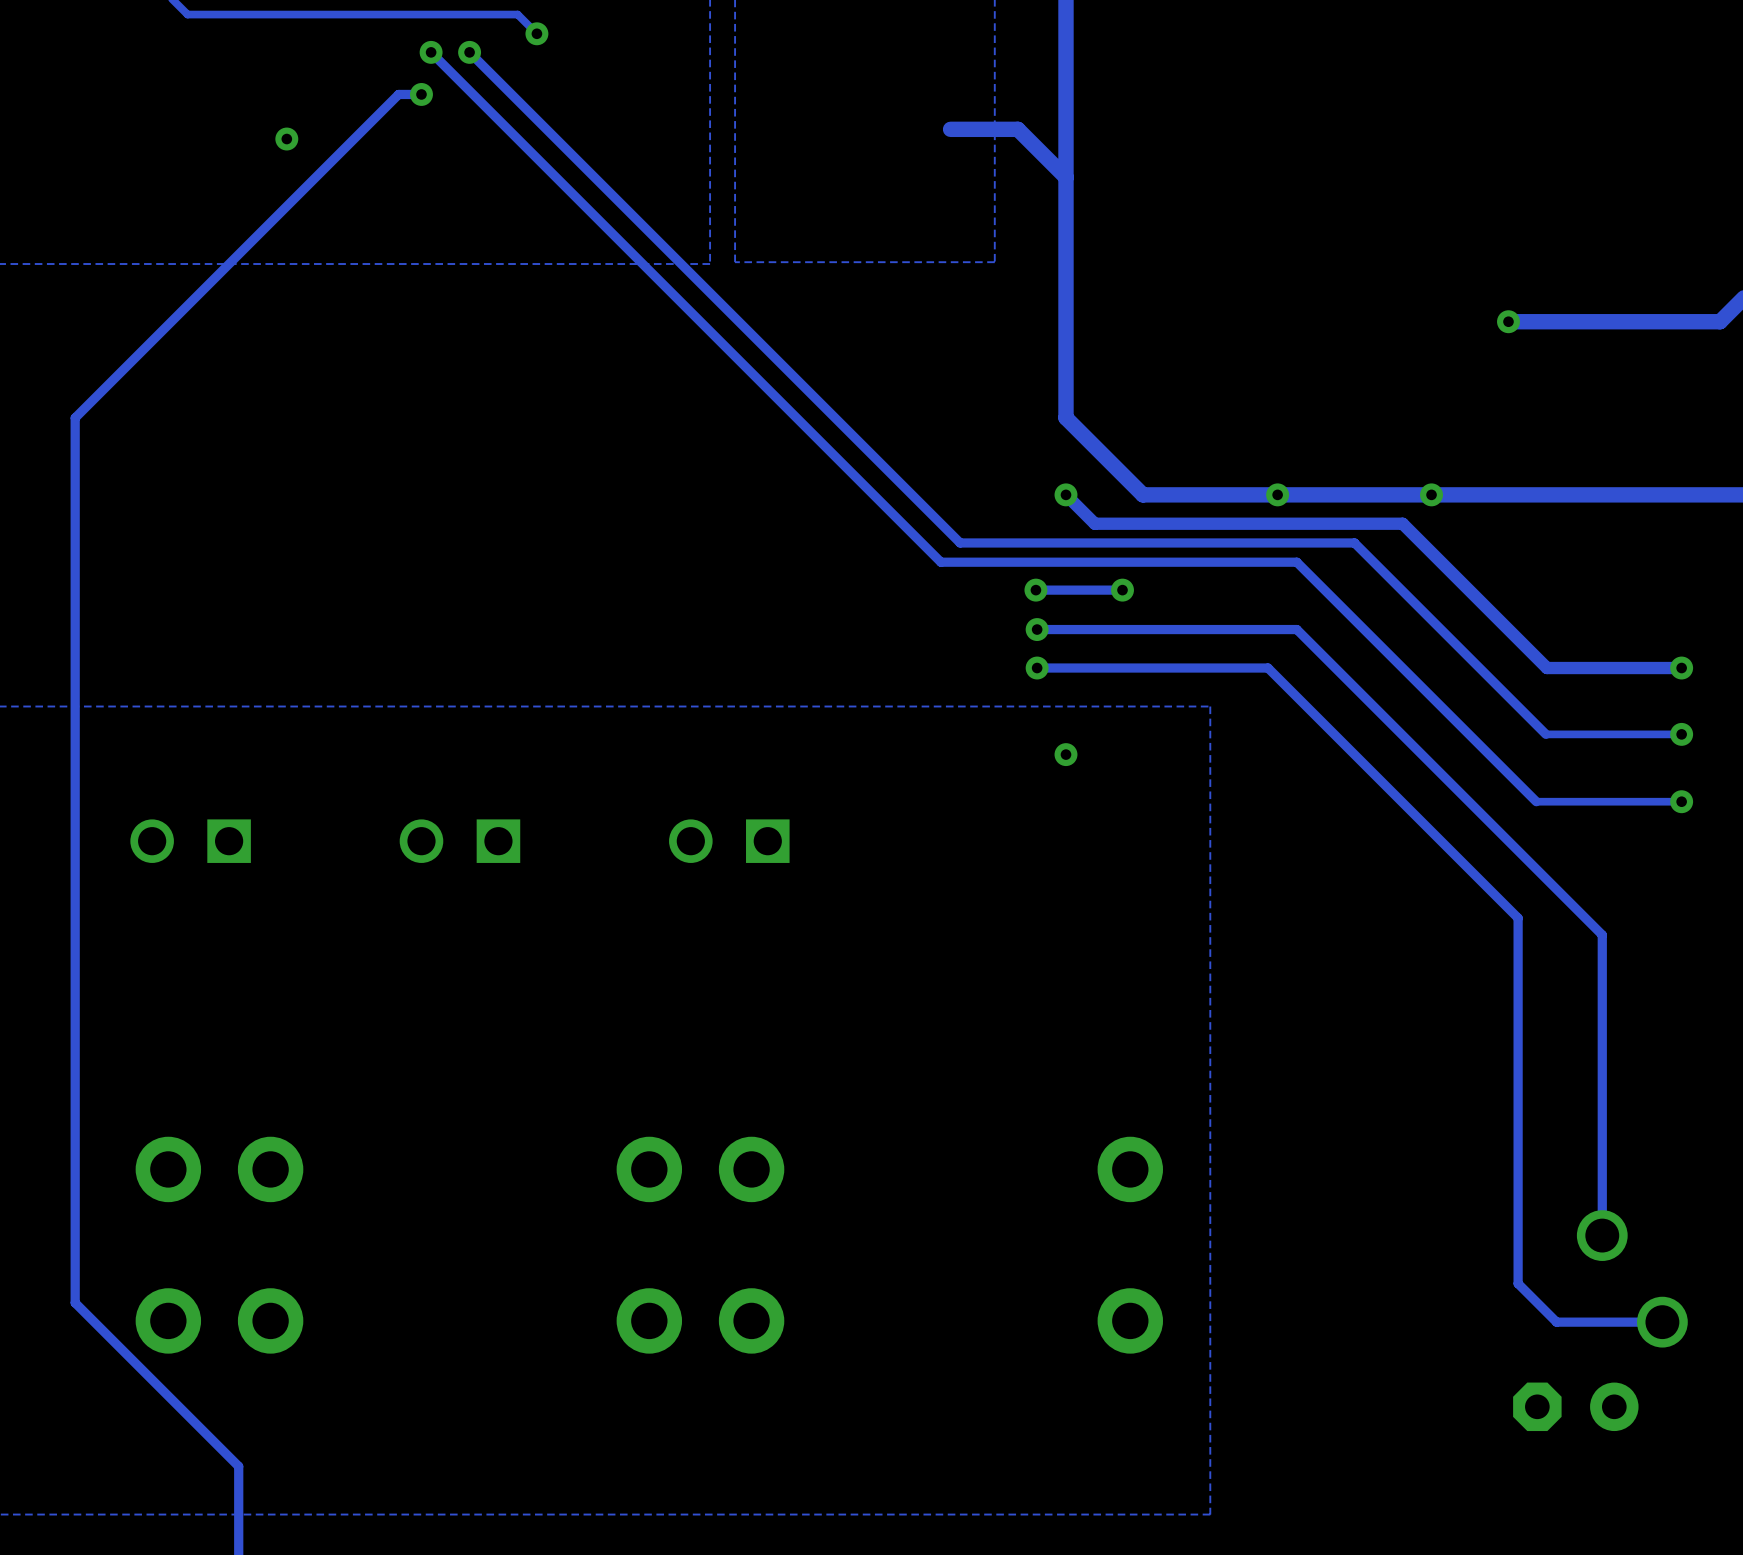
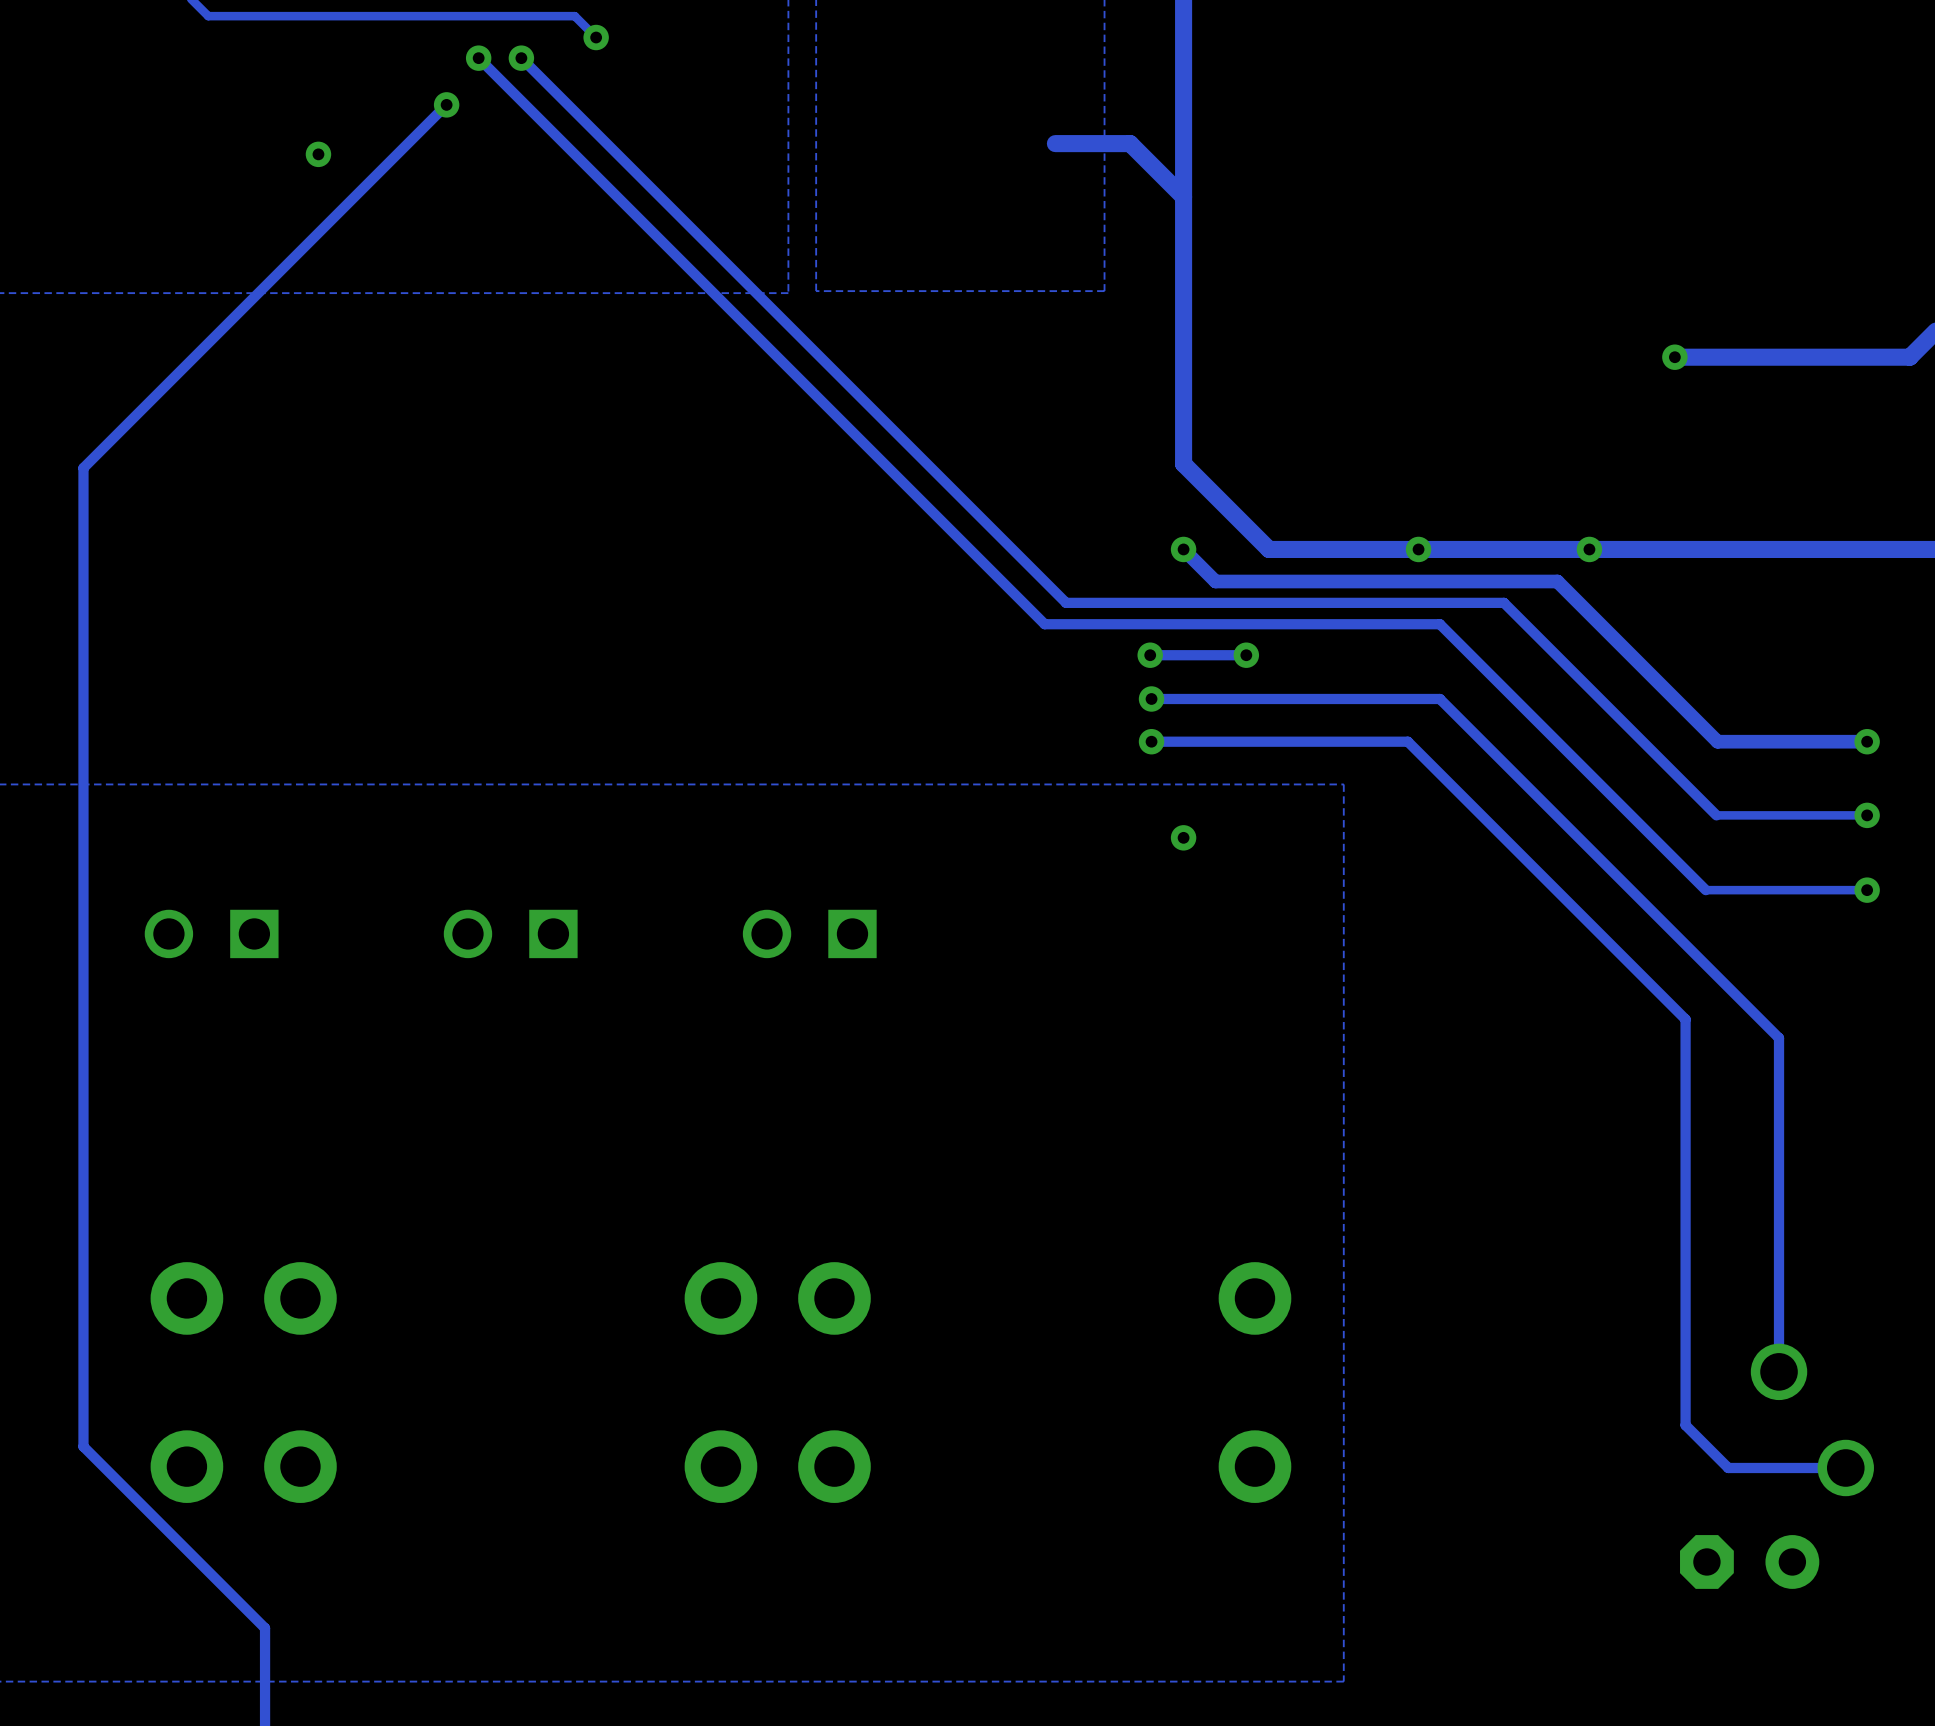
track: (421, 94) (398, 94) (75, 417) (75, 421) -> (446, 104) (83, 468)
via position: (421, 94) -> (446, 104)

